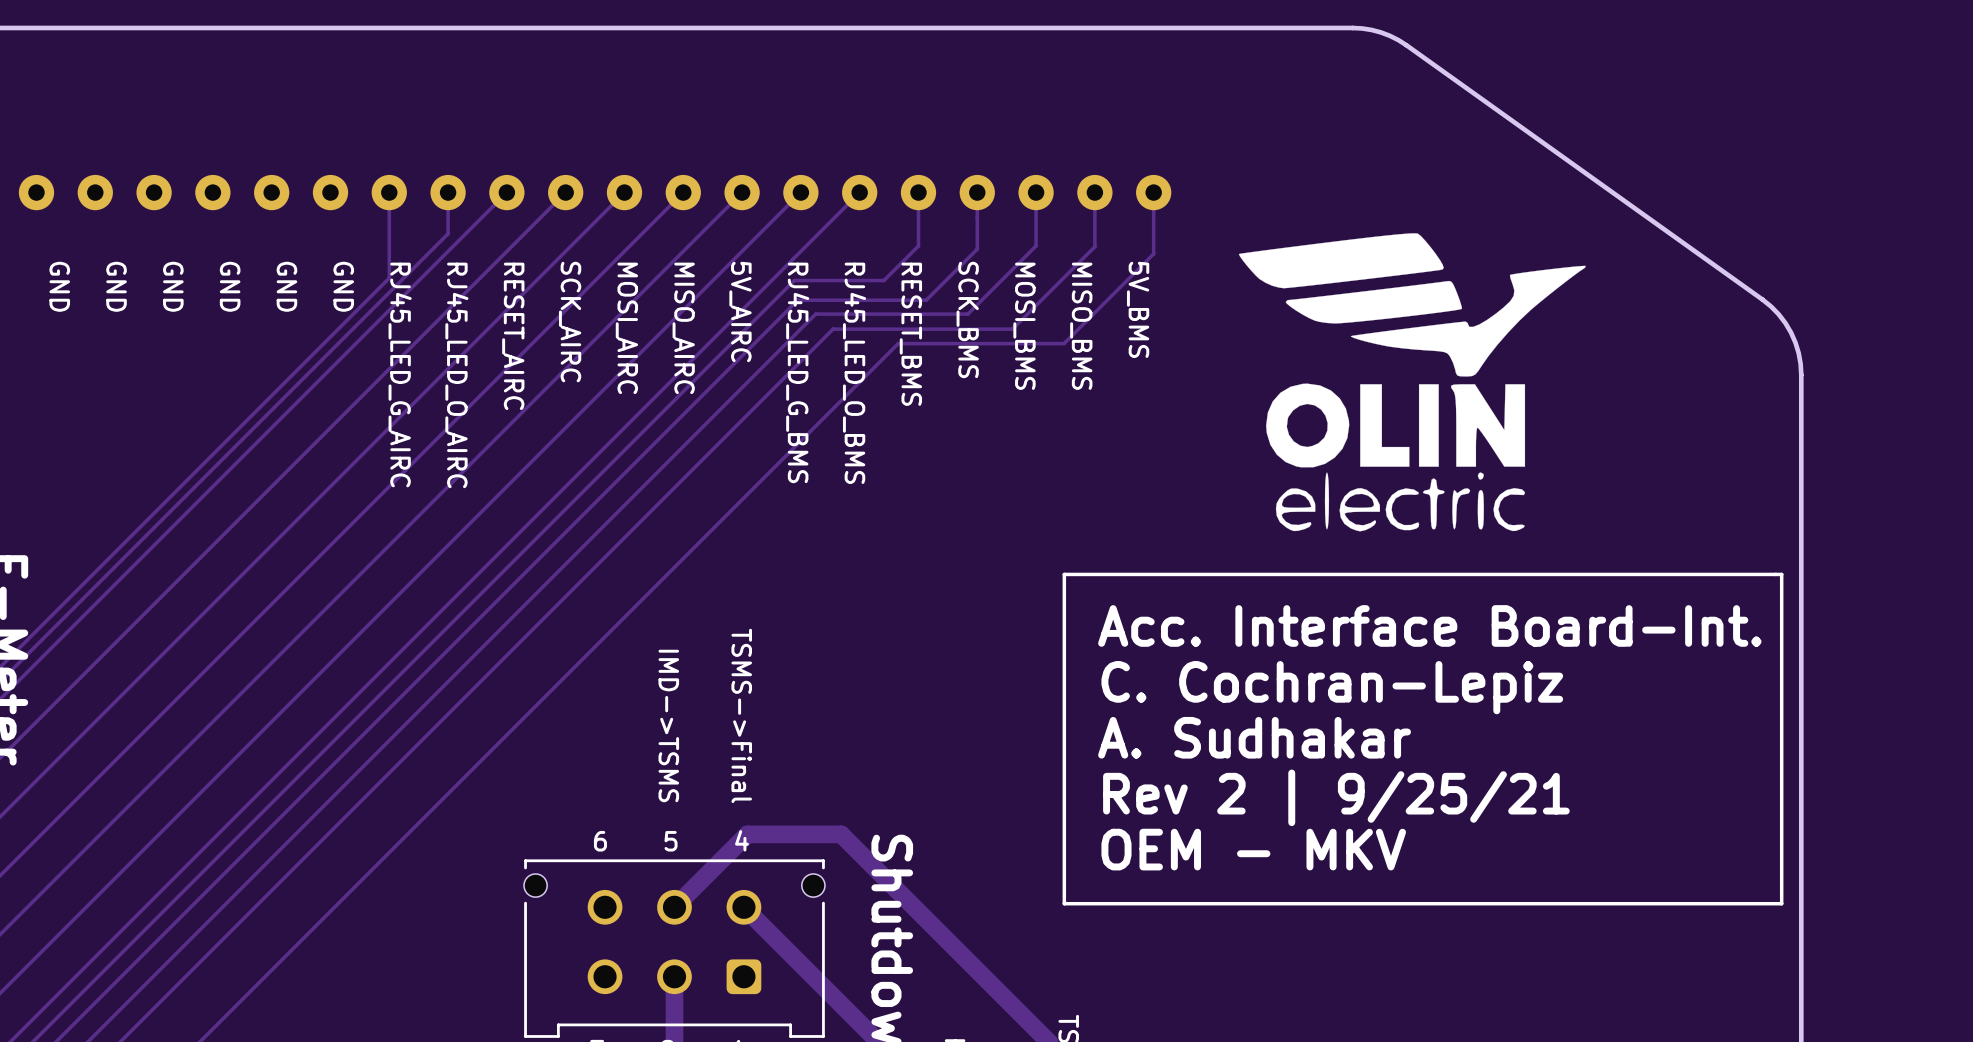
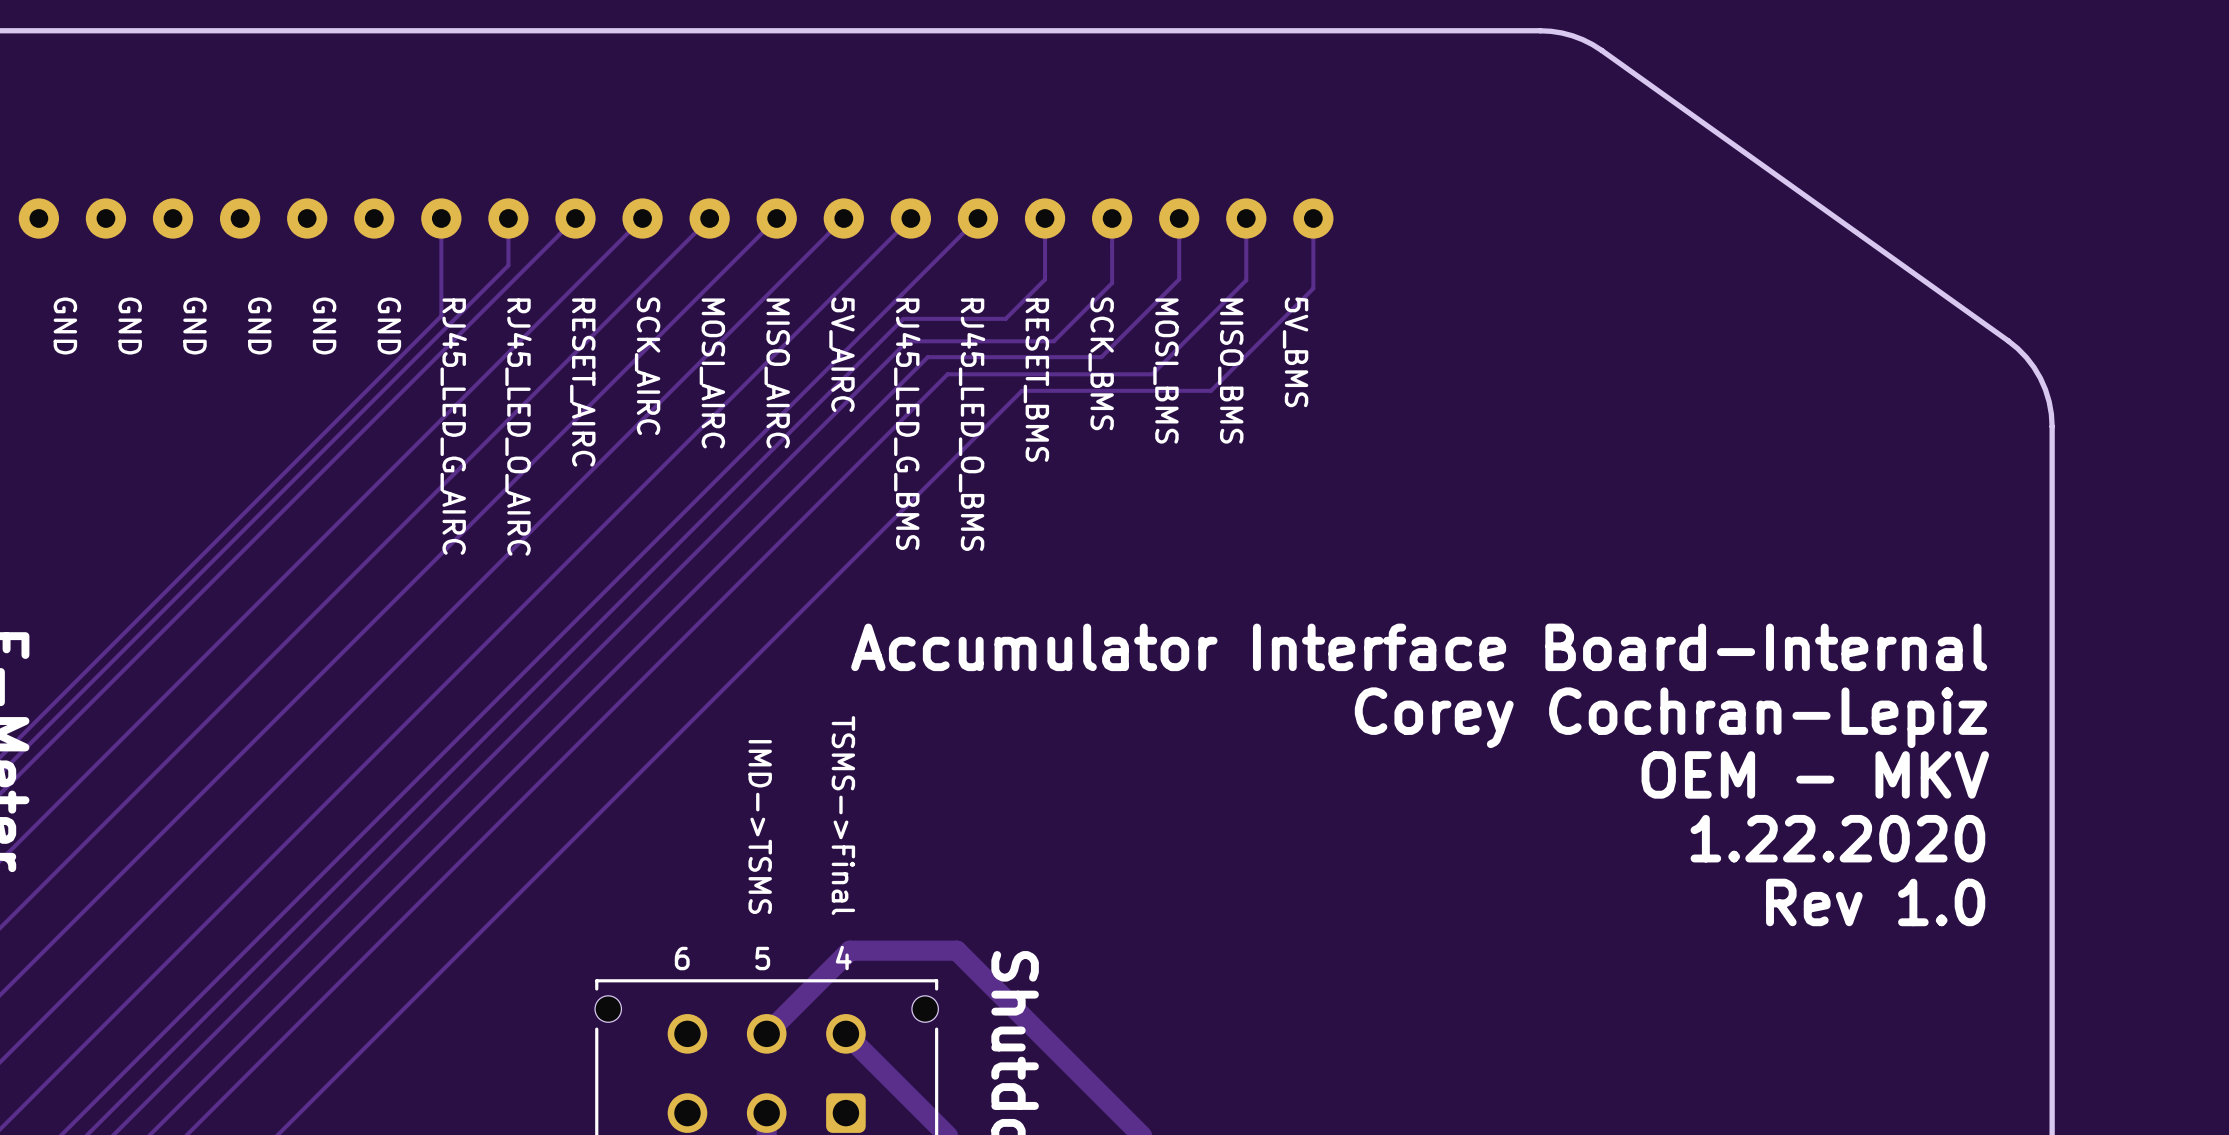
drawing: [1238, 233, 1586, 532] -> none
text: none -> Accumulator Interface Board-Internal (1419, 647)
line: (1781, 574) (1064, 574) (1064, 903) (1781, 903) (1781, 574) -> none
text: Acc. Interface Board-Int. (1429, 625) -> none
text: none -> Corey Cochran-Lepiz (1670, 717)
text: none -> OEM - MKV (1815, 774)
text: C. Cochran-Lepiz (1332, 687) -> none
text: none -> 1.22.2020 (1837, 838)
text: A. Sudhakar (1254, 737) -> none
text: none -> Rev 1.0 (1875, 902)
text: Rev 2 | 9/25/21 (1336, 797) -> none
text: OEM - MKV (1253, 849) -> none

